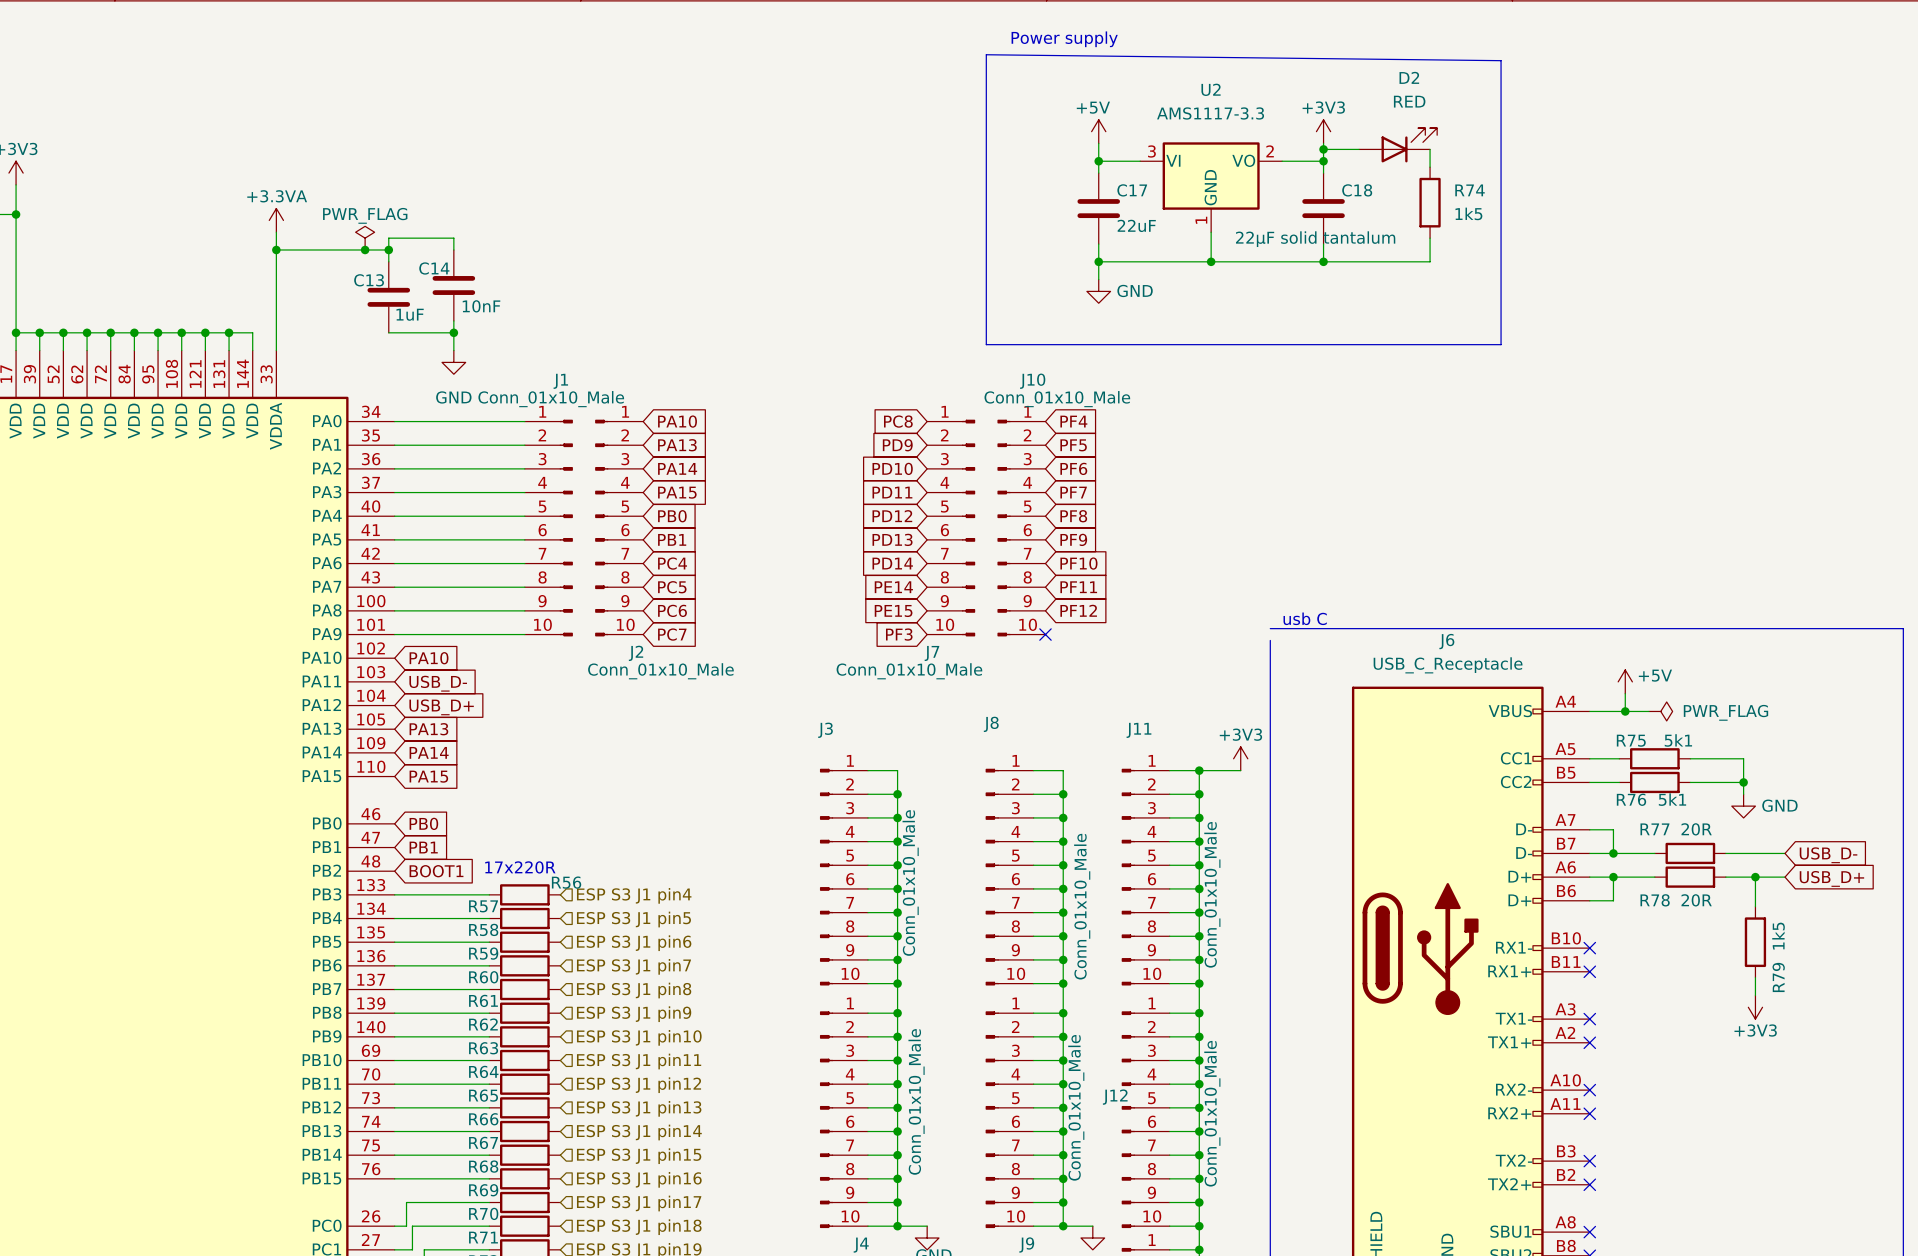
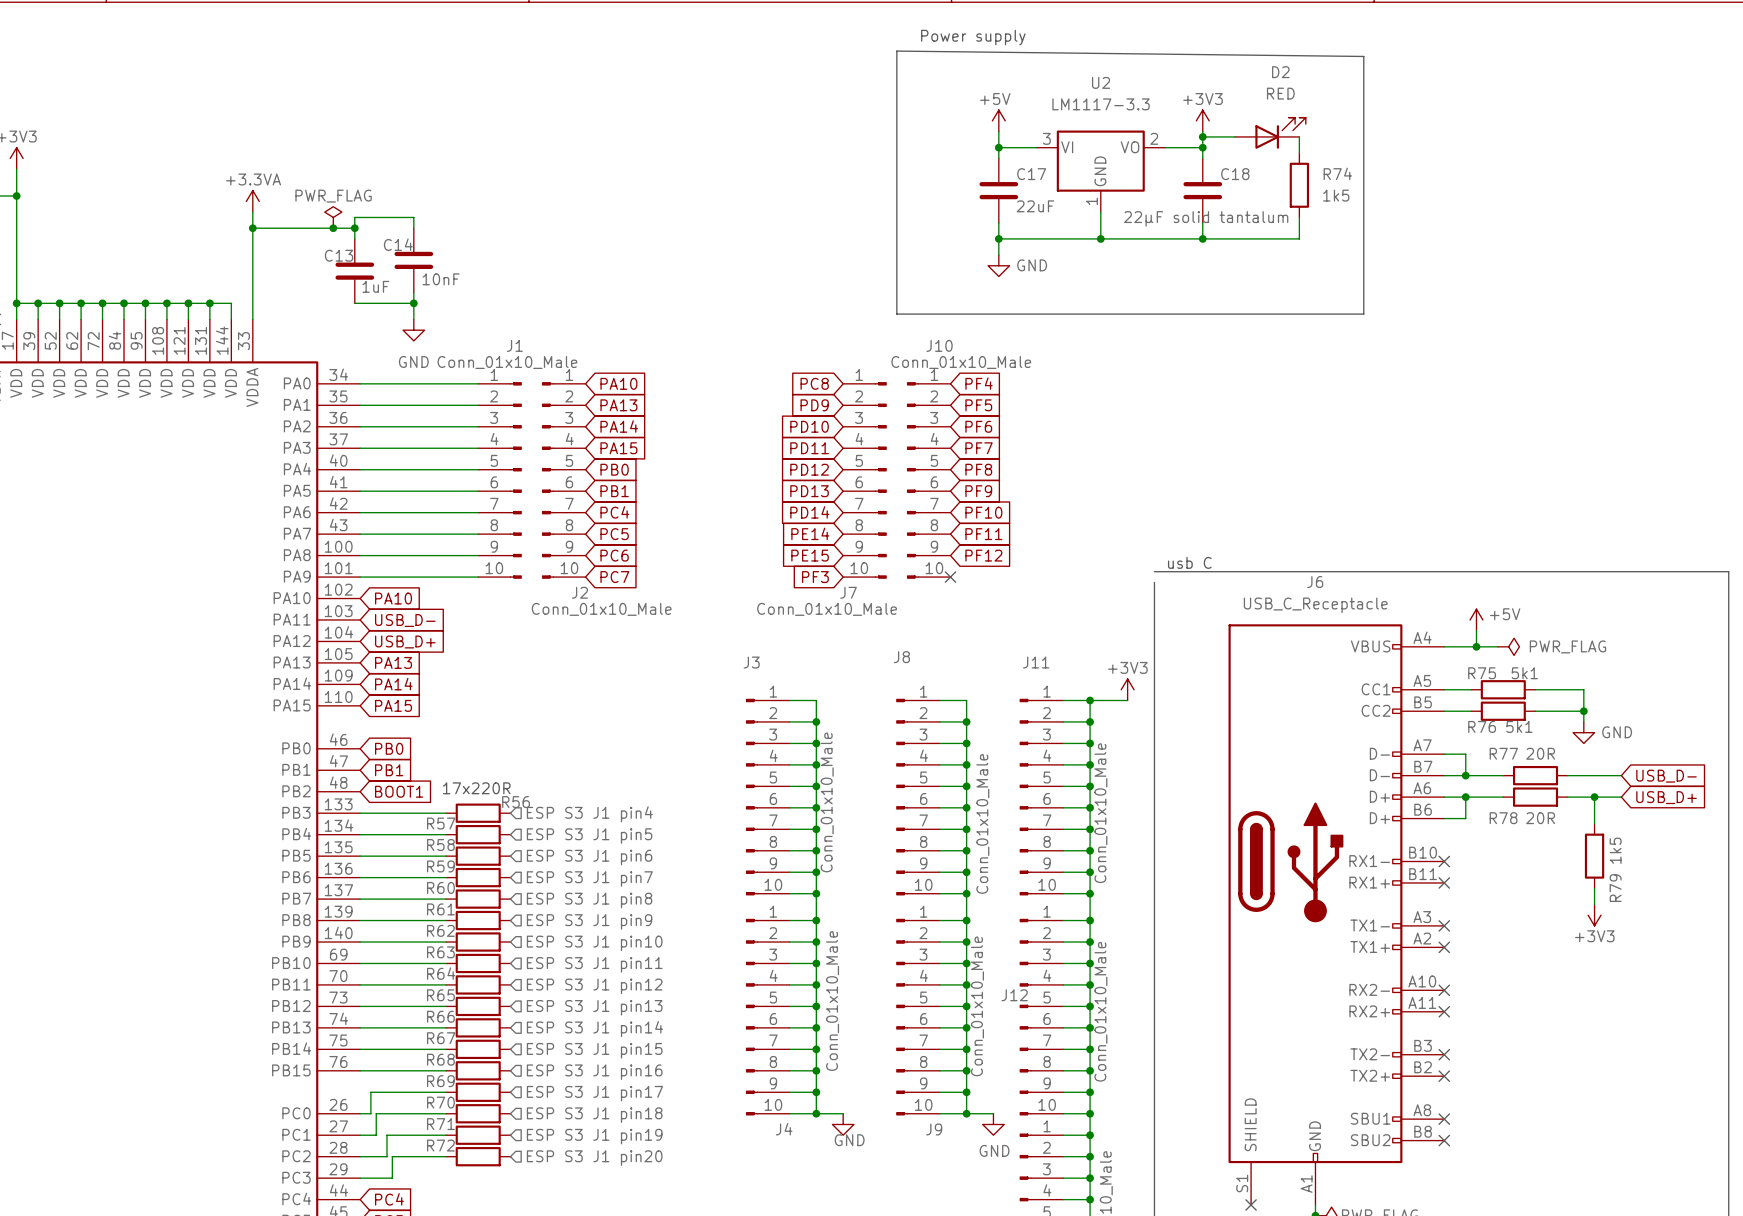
U2 value: AMS1117-3.3 (1210, 113) -> LM1117-3.3 (1101, 104)

